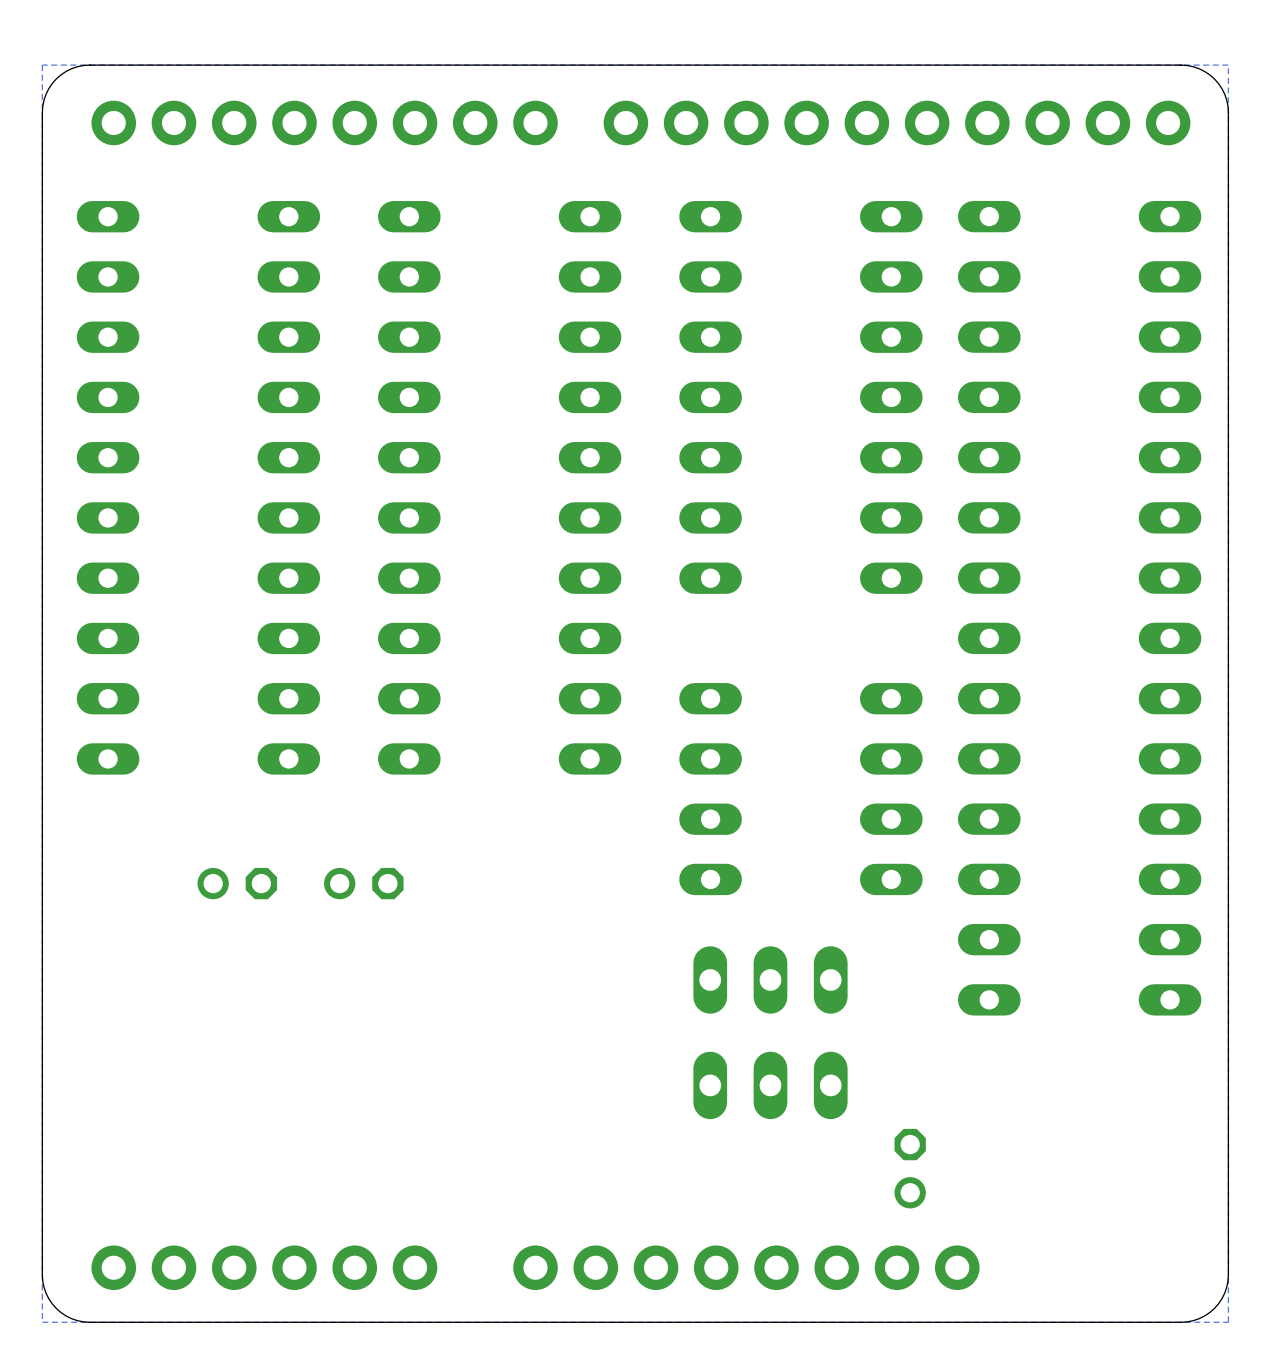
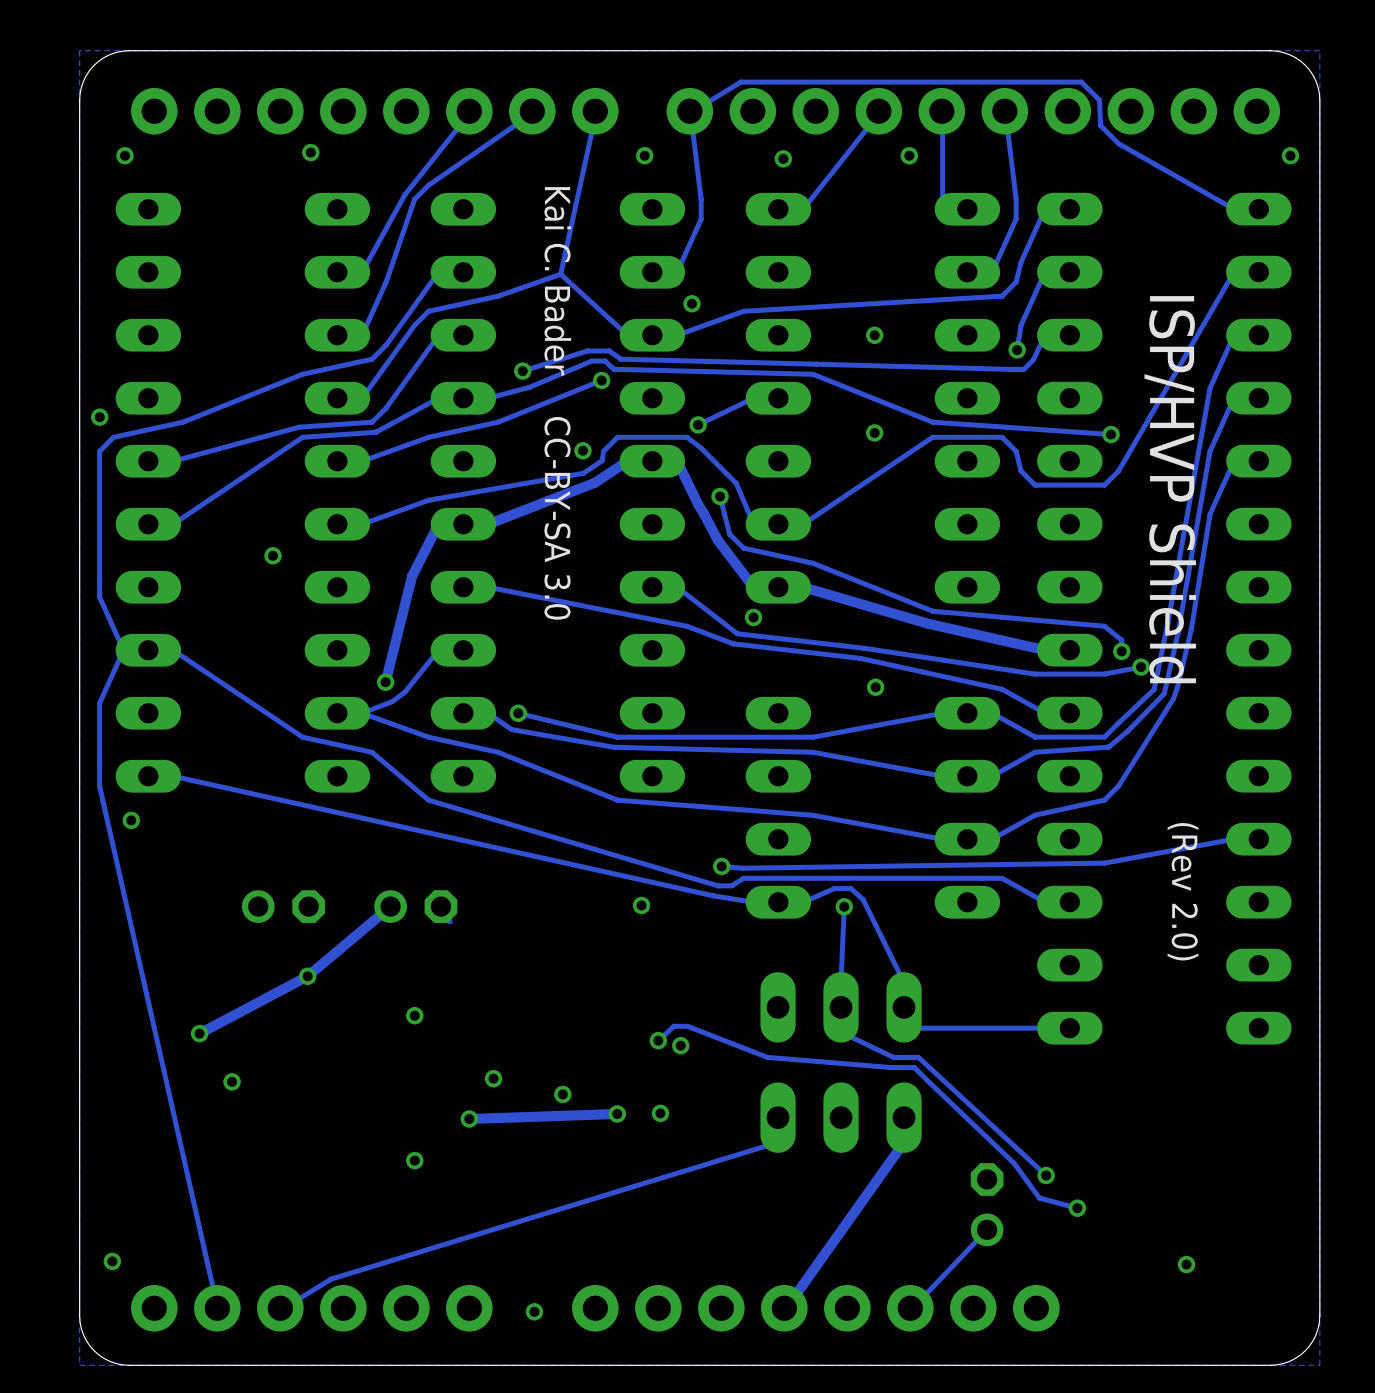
track: none -> (470, 112) (404, 194) (362, 272) (337, 272)
track: none -> (533, 112) (428, 185) (414, 199) (386, 282) (362, 335) (337, 335)
track: none -> (596, 112) (560, 274)
track: none -> (879, 112) (803, 209) (778, 209)
track: none -> (942, 112) (942, 209) (967, 209)
track: none -> (1005, 112) (1016, 199) (1016, 219) (992, 272) (967, 272)
via: none -> (310, 152)
via: none -> (124, 155)
via: none -> (644, 155)
via: none -> (909, 155)
via: none -> (1290, 155)
via: none -> (783, 158)
track: none -> (1069, 209) (1045, 209) (1021, 262) (1016, 282) (1002, 296) (743, 311) (677, 335) (627, 335) (560, 274)
track: none -> (1258, 209) (1234, 209) (1118, 143) (1100, 125) (1099, 100) (1081, 82) (740, 82) (690, 112) (701, 199) (701, 219) (677, 272) (652, 272)
track: none -> (463, 272) (438, 272) (386, 345) (372, 359) (302, 374) (183, 422) (113, 437) (99, 451) (99, 597) (123, 650)
track: none -> (1069, 272) (1045, 272) (1021, 325) (1017, 350)
track: none -> (1258, 272) (1234, 272) (1118, 471) (1104, 485) (1035, 485) (1021, 471) (1016, 451) (1002, 437) (932, 437) (803, 524) (753, 524) (736, 483) (701, 448) (687, 437) (617, 437) (603, 451) (602, 460) (583, 473) (428, 500) (362, 524) (337, 524)
track: none -> (560, 274) (498, 296) (428, 311) (414, 325) (362, 398) (337, 398)
via: none -> (691, 303)
track: none -> (463, 335) (438, 335) (386, 408) (372, 422) (299, 427) (173, 461) (148, 461)
via: none -> (874, 335)
track: none -> (1069, 335) (1045, 335) (1033, 359) (1023, 369) (620, 359) (609, 350) (587, 350) (522, 371)
track: none -> (1258, 335) (1234, 335) (1210, 388) (1154, 689) (1104, 737) (1035, 737) (992, 713) (942, 713) (813, 737) (617, 737) (518, 713)
via: none -> (1017, 350)
via: none -> (522, 371)
track: none -> (601, 380) (498, 422) (428, 437) (362, 461) (337, 461)
via: none -> (601, 380)
track: none -> (778, 398) (753, 398) (698, 424)
track: none -> (1258, 398) (1234, 398) (1210, 451) (1177, 633) (1164, 693) (1128, 730) (1108, 747) (1035, 752) (992, 776) (942, 776) (813, 752) (614, 747) (511, 729) (488, 713) (463, 713)
text: none -> Kai C. Bader CC-BY-SA 3.0 (557, 403)
via: none -> (99, 417)
via: none -> (698, 424)
via: none -> (874, 432)
track: none -> (1111, 434) (932, 422) (813, 374) (614, 369) (605, 361) (591, 361) (529, 387) (488, 398) (438, 398) (375, 432) (302, 437) (173, 524) (148, 524)
via: none -> (1111, 434)
via: none -> (582, 450)
track: none -> (1258, 461) (1234, 461) (1210, 514) (1191, 630) (1177, 687) (1173, 698) (1118, 786) (1104, 800) (1035, 815) (992, 839) (942, 839) (813, 815) (617, 800) (498, 752) (428, 737) (362, 713)
text: none -> ISP/HVP Shield (1170, 489)
track: none -> (720, 496) (729, 534) (743, 548) (813, 563) (932, 611) (1104, 626) (1121, 640) (1121, 651)
via: none -> (720, 496)
via: none -> (273, 555)
track: none -> (463, 587) (488, 587) (687, 626) (733, 643) (860, 658) (1002, 689) (1045, 713) (1069, 713)
track: none -> (652, 587) (677, 587) (737, 633) (864, 648) (1035, 674) (1104, 674) (1141, 667)
via: none -> (753, 617)
track: none -> (123, 650) (173, 650) (302, 737) (372, 752) (428, 800) (718, 885) (731, 885) (743, 878) (1002, 878) (1045, 902) (1069, 902)
track: none -> (123, 650) (99, 703) (99, 786) (218, 1309)
track: none -> (463, 650) (438, 650) (404, 692) (392, 701) (362, 713)
track: none -> (1069, 650) (1045, 650) (928, 623) (803, 587) (753, 587) (717, 540) (677, 461) (627, 461) (594, 482) (488, 524) (438, 524) (412, 576) (385, 682)
via: none -> (1121, 651)
via: none -> (1141, 667)
via: none -> (385, 682)
via: none -> (875, 687)
via: none -> (518, 713)
track: none -> (148, 776) (173, 776) (713, 895) (753, 902) (803, 902) (834, 888) (850, 888) (863, 899) (904, 982) (904, 1028) (1069, 1028)
via: none -> (131, 820)
track: none -> (1258, 839) (1234, 839) (1104, 863) (742, 868) (721, 866)
via: none -> (721, 866)
text: none -> (Rev 2.0) (1182, 891)
via: none -> (641, 905)
track: none -> (390, 906) (307, 976) (199, 1033)
track: none -> (844, 906) (841, 1032) (893, 1057) (919, 1058) (1046, 1175)
via: none -> (844, 906)
track: none -> (447, 919) (450, 921)
via: none -> (307, 976)
via: none -> (414, 1015)
via: none -> (199, 1033)
track: none -> (658, 1040) (674, 1026) (687, 1026) (767, 1057) (890, 1067) (914, 1067) (1014, 1163) (1039, 1198) (1077, 1208)
via: none -> (658, 1040)
via: none -> (680, 1045)
via: none -> (493, 1078)
via: none -> (232, 1081)
via: none -> (562, 1094)
track: none -> (617, 1113) (469, 1119)
via: none -> (617, 1113)
via: none -> (660, 1113)
track: none -> (778, 1117) (778, 1142) (331, 1279) (281, 1309)
track: none -> (904, 1117) (904, 1142) (785, 1309)
via: none -> (469, 1119)
via: none -> (414, 1160)
via: none -> (1046, 1175)
via: none -> (1077, 1208)
track: none -> (987, 1229) (911, 1309)
via: none -> (112, 1261)
via: none -> (1186, 1264)
via: none -> (534, 1311)

